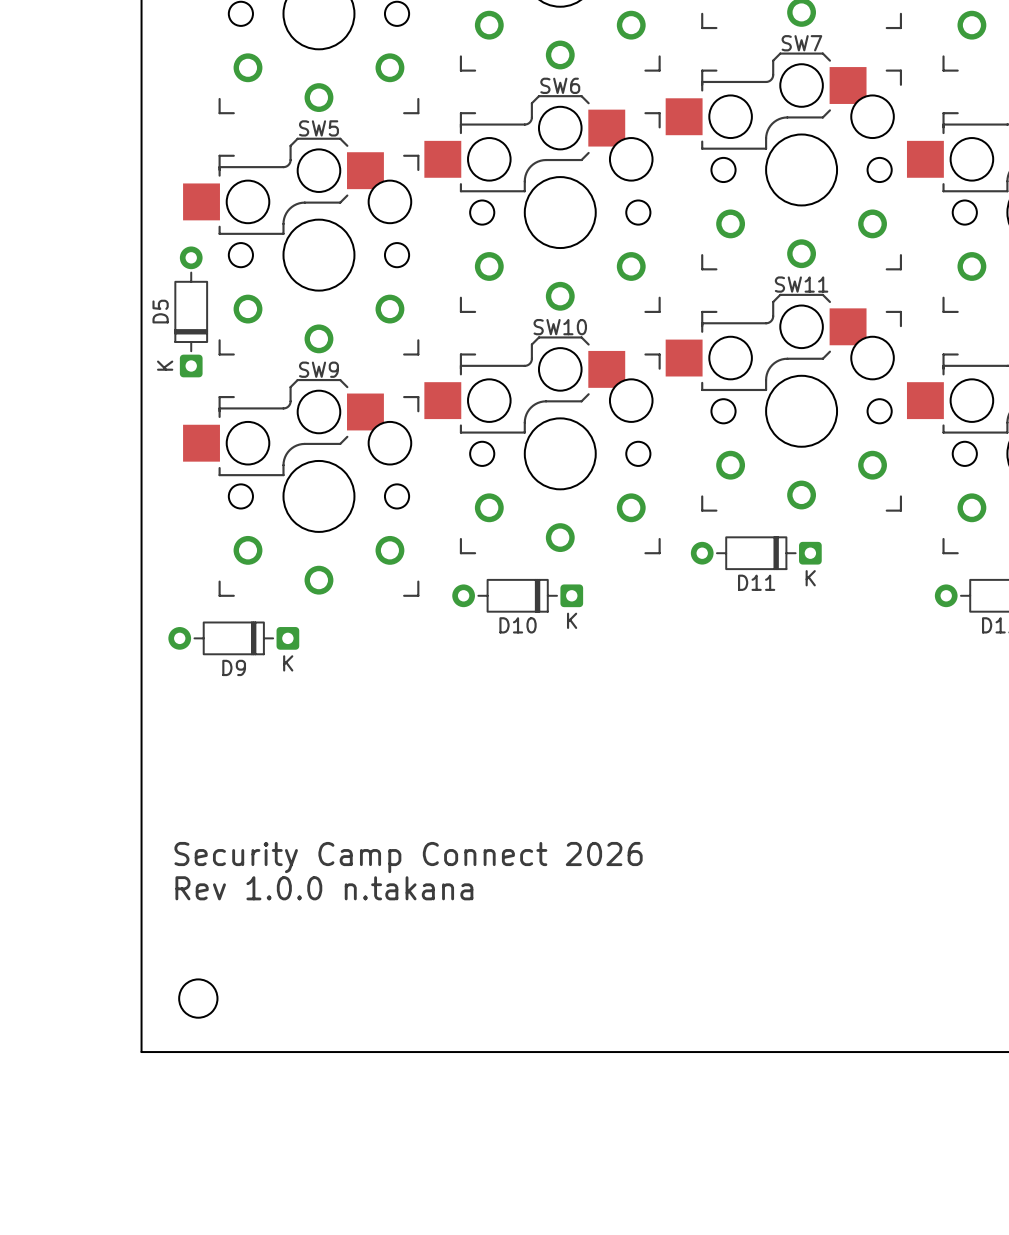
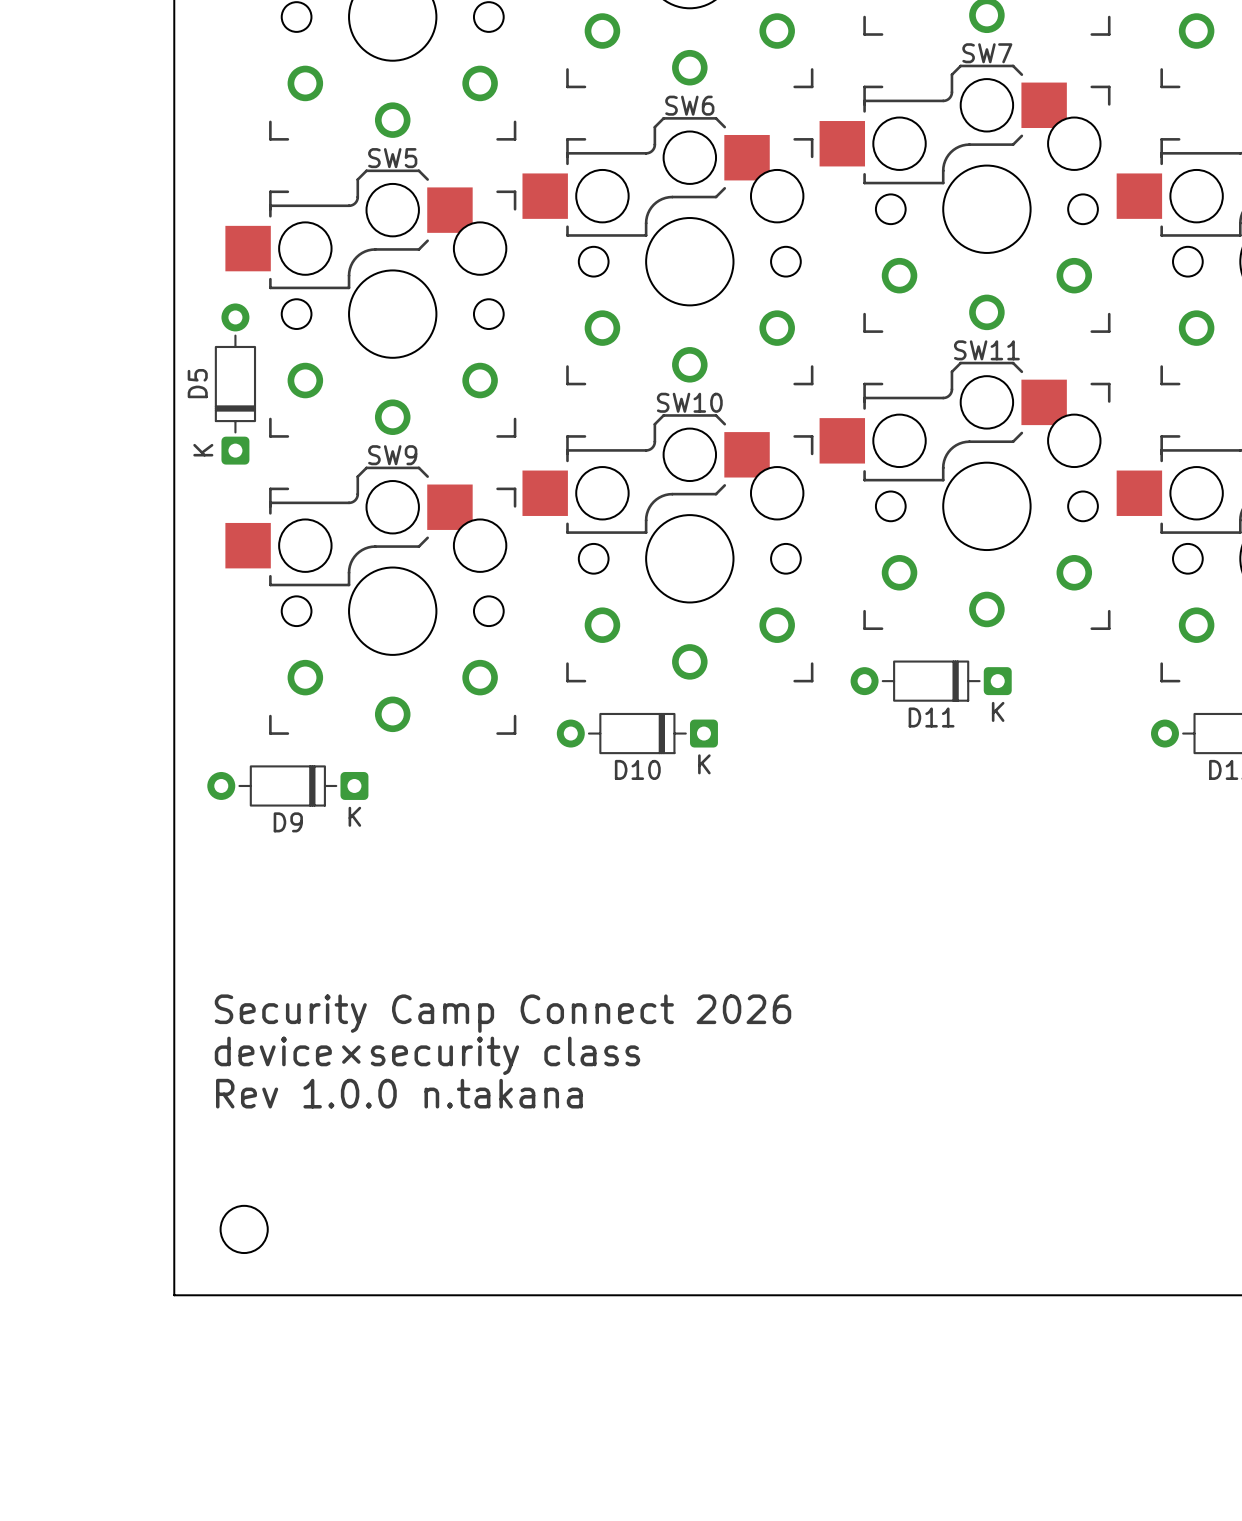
text: none -> Security Camp Connect 2026 (503, 1013)
text: Security Camp Connect 2026 (408, 857) -> device×security class (427, 1055)

